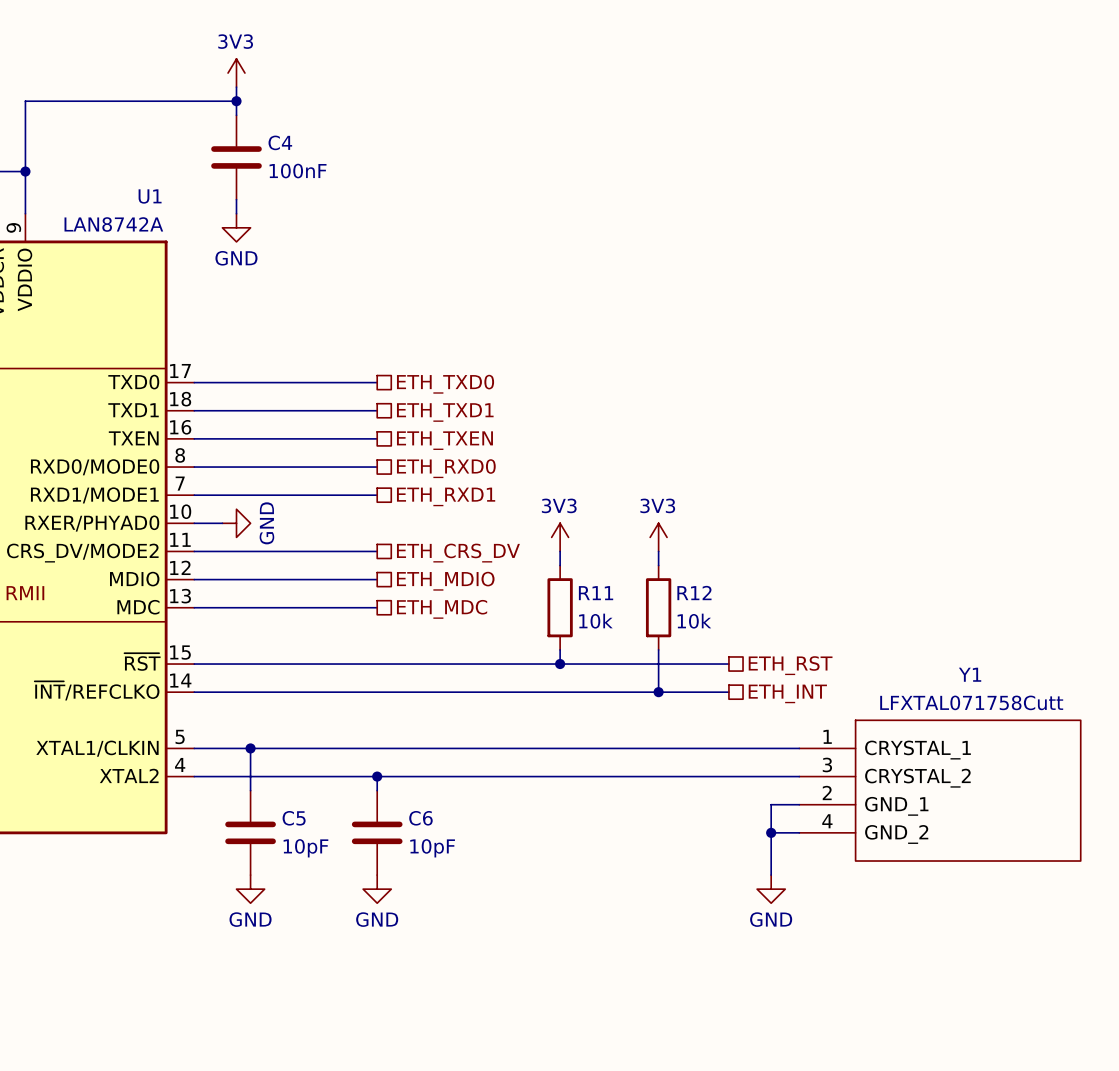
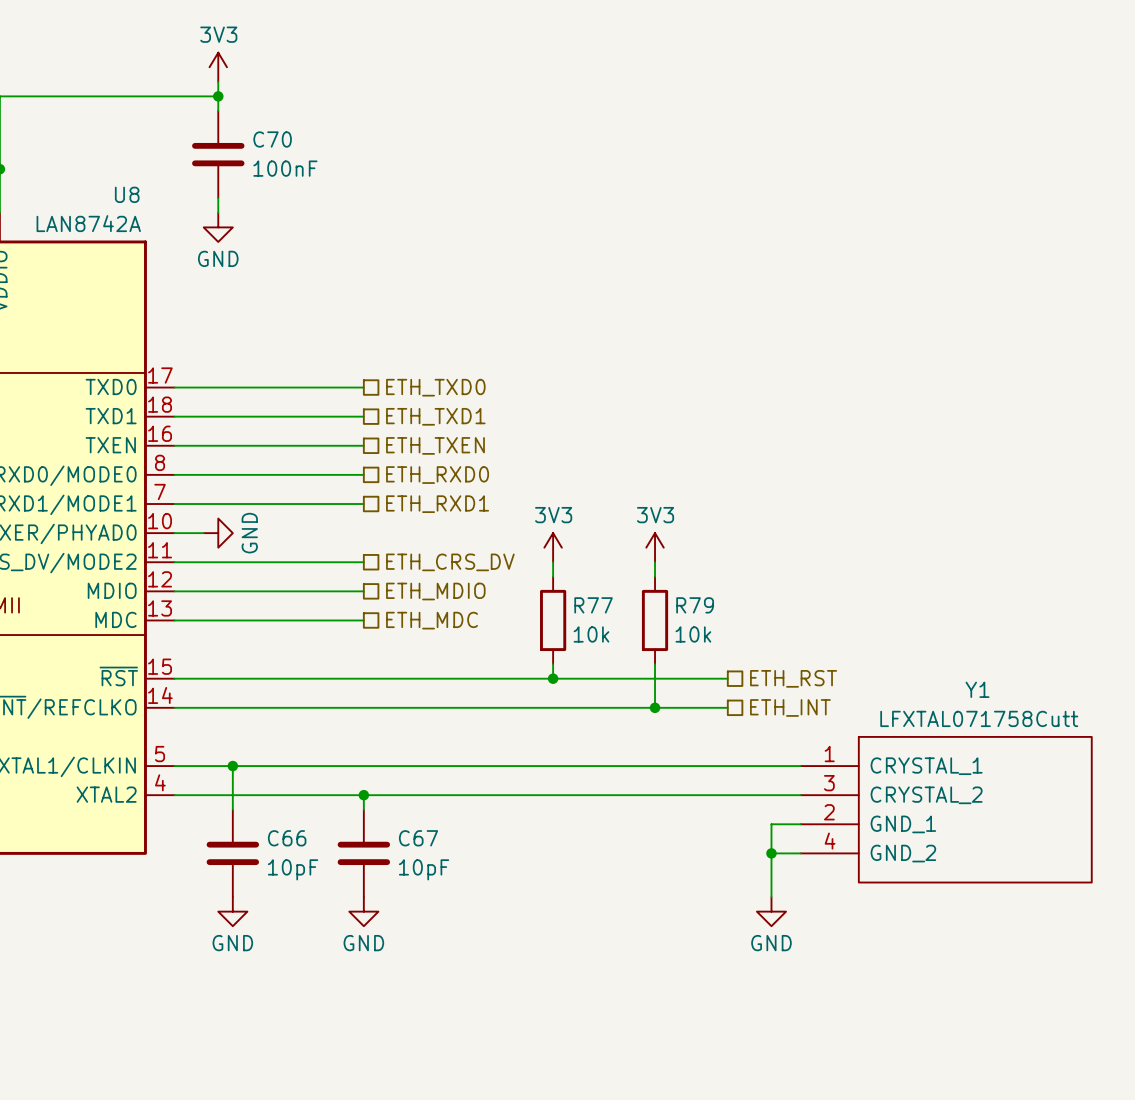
C4 name: C4 (280, 142) -> C70 (272, 139)
U1 name: U1 (150, 196) -> U8 (127, 194)
R11 name: R11 (596, 593) -> R77 (593, 605)
R12 name: R12 (694, 593) -> R79 (695, 605)
C5 name: C5 (294, 818) -> C66 (287, 838)
C6 name: C6 (420, 818) -> C67 (418, 838)

